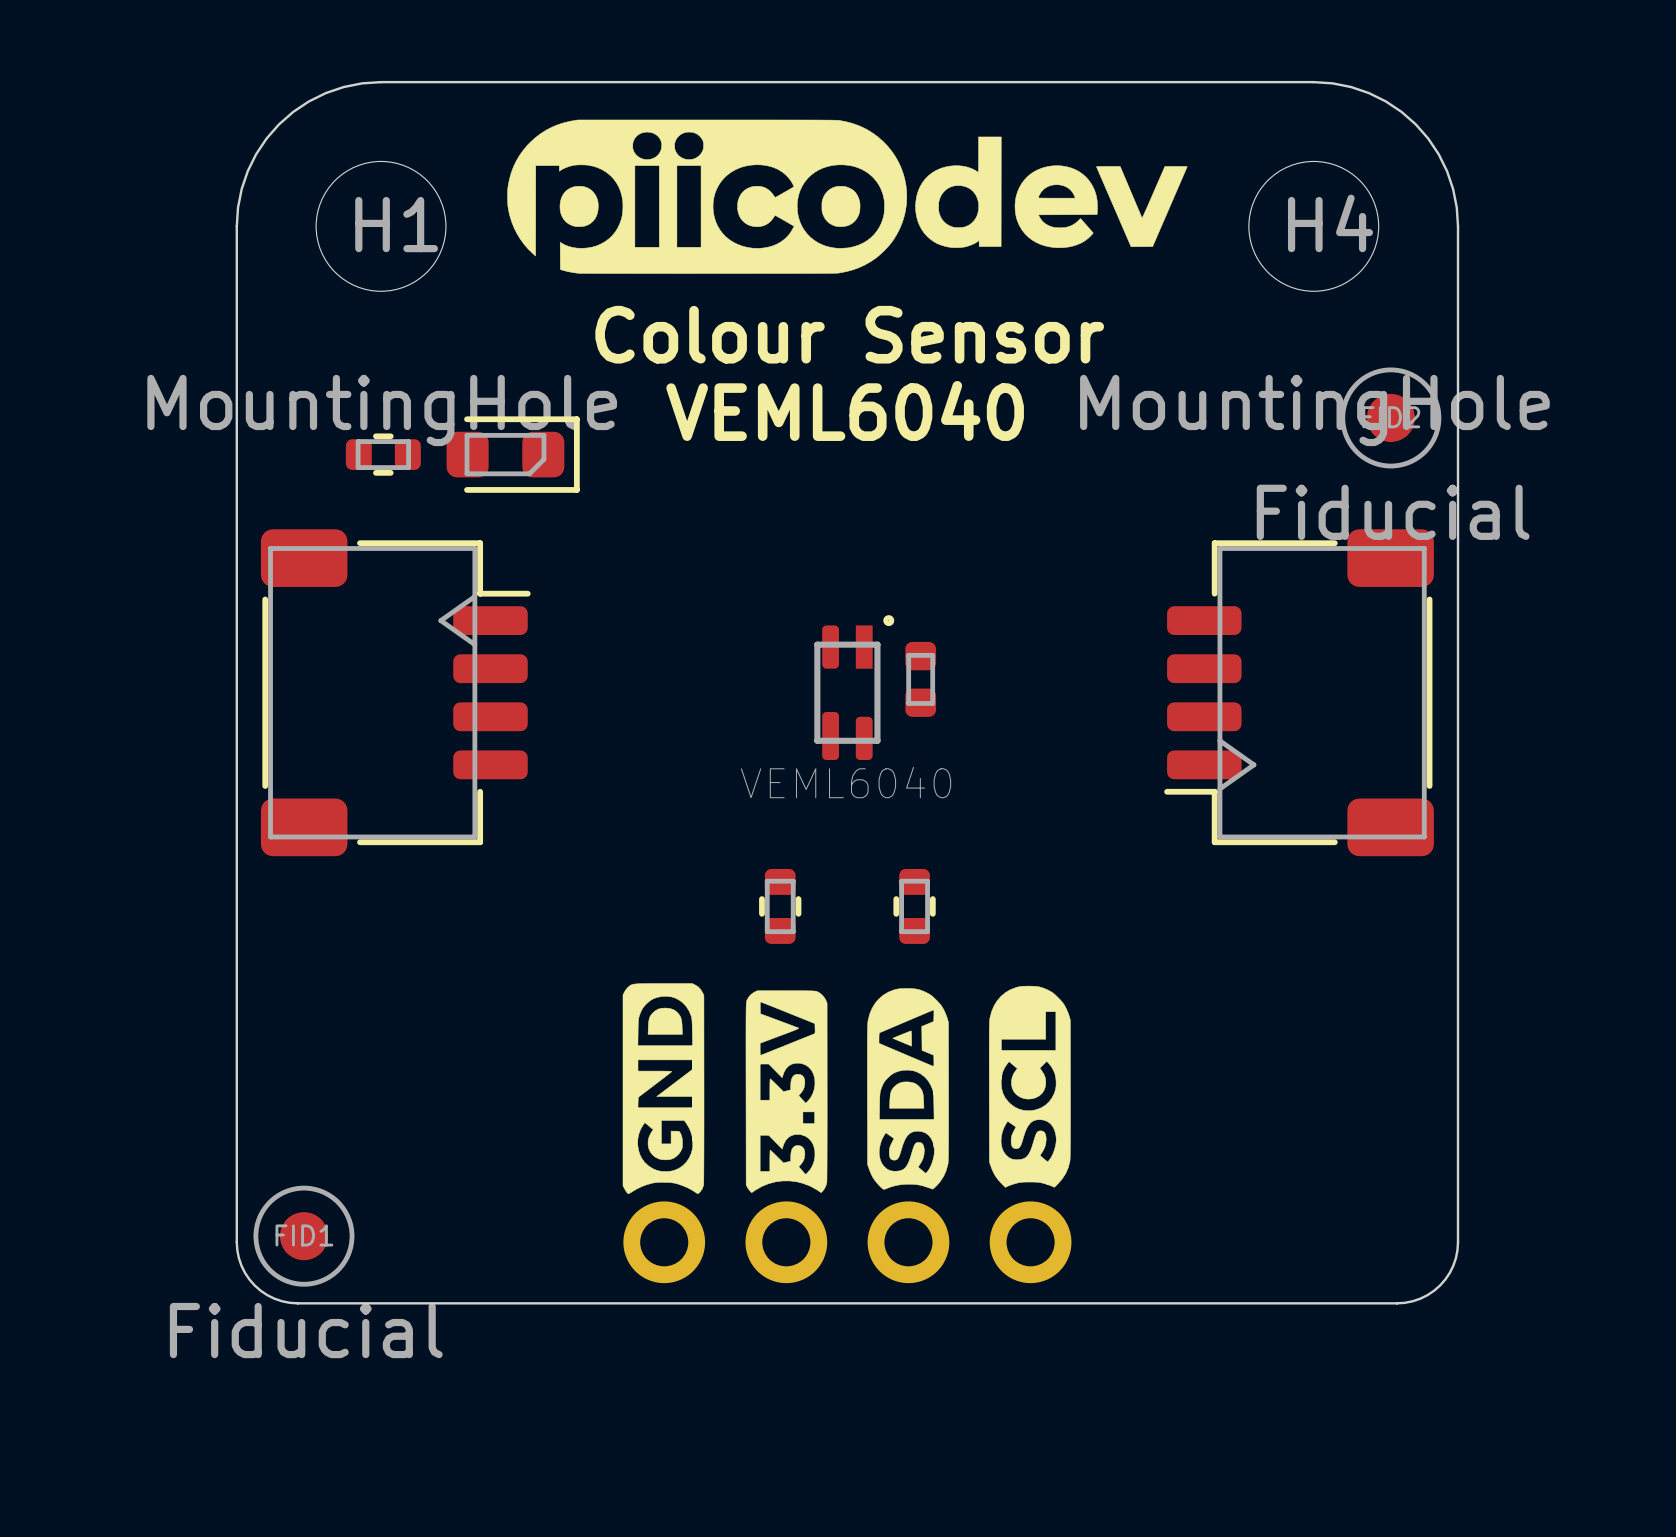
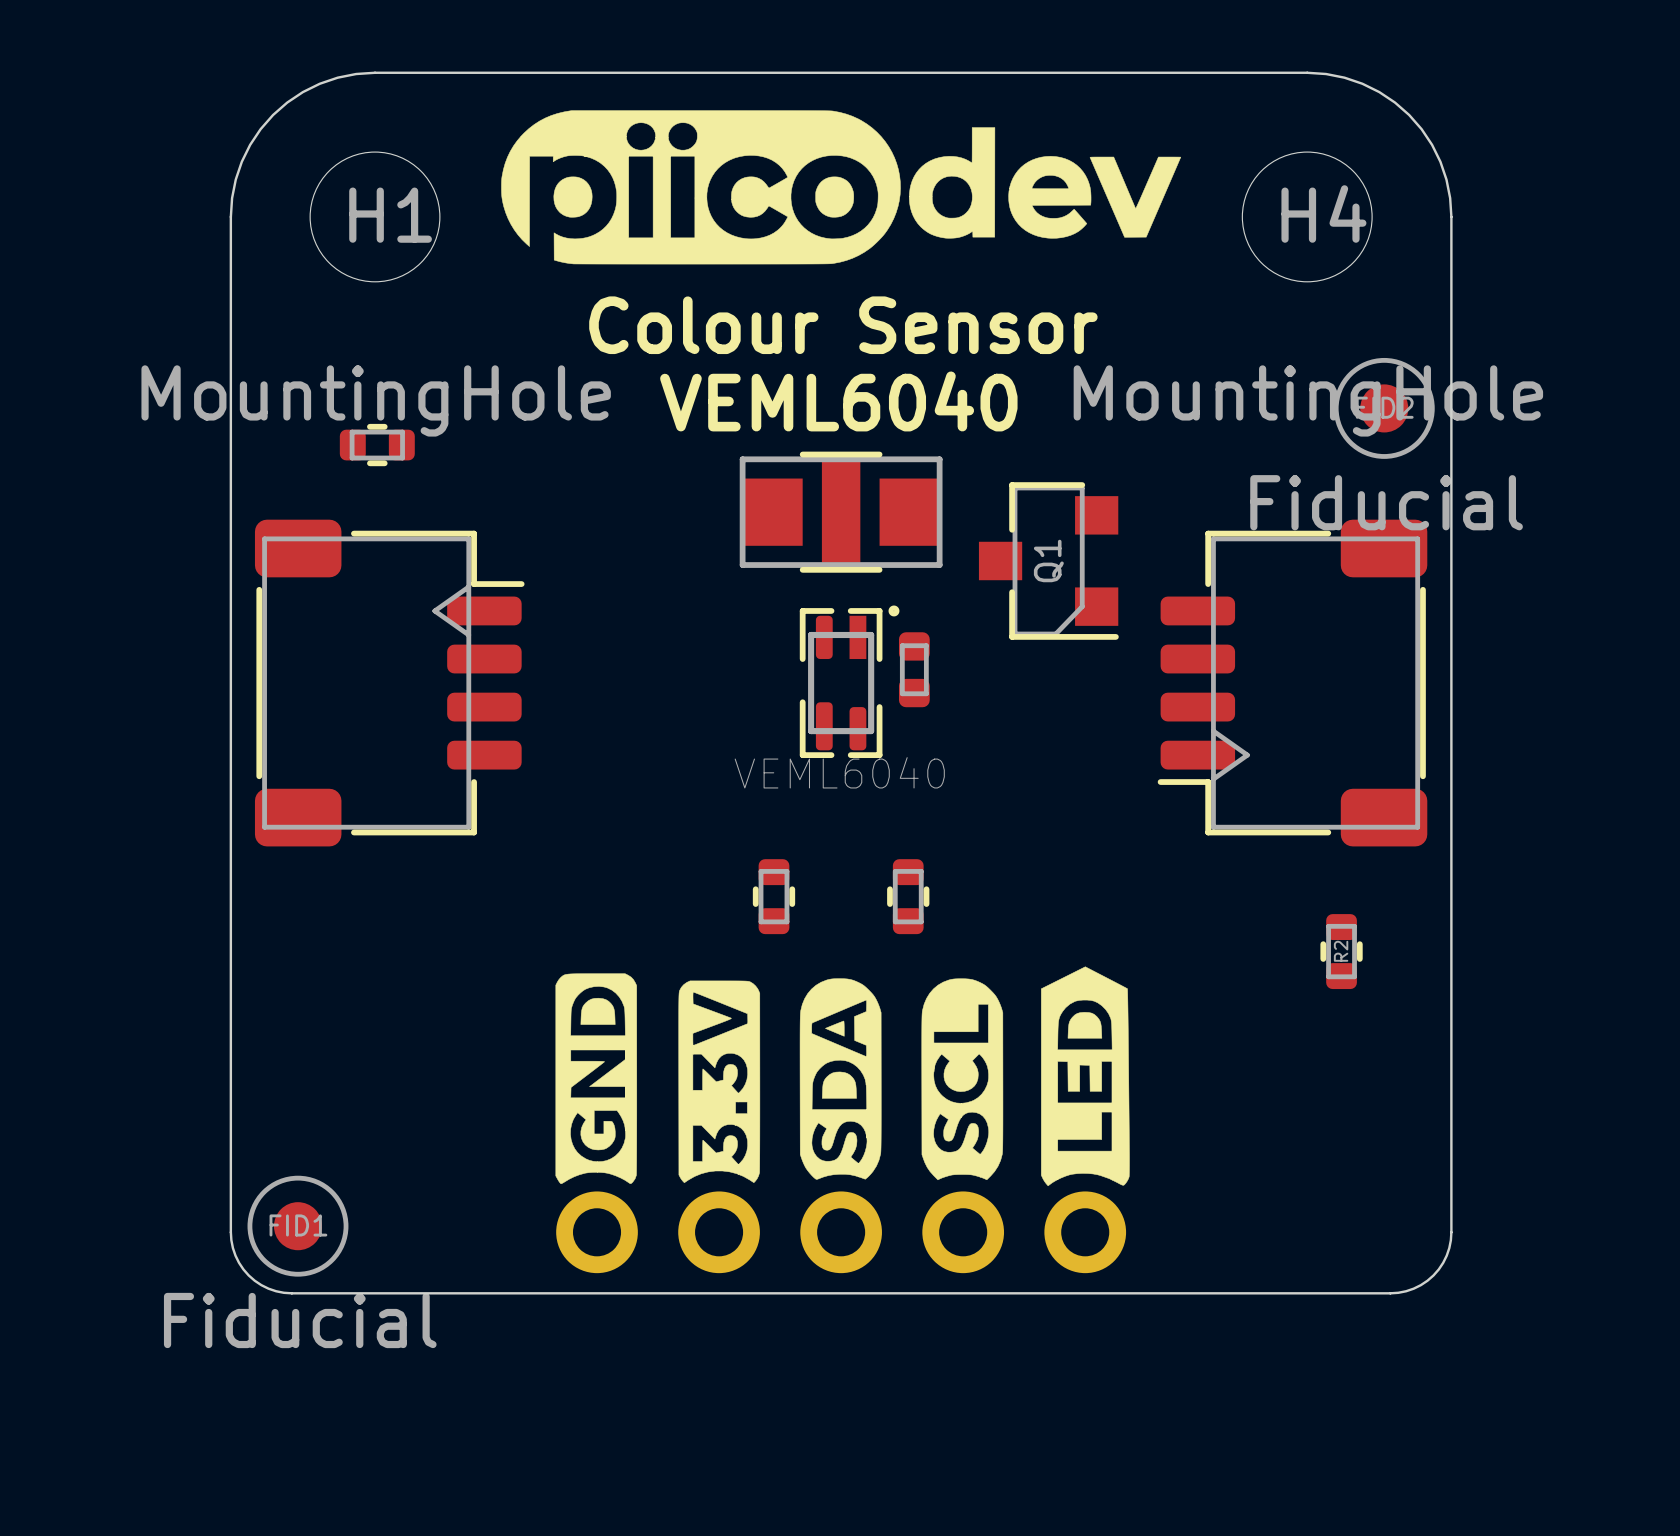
part: (513, 454) -> none
part: none -> (841, 512)
Q1: none -> (1048, 560)
part footprint: [814, 615, 895, 761] -> [799, 605, 900, 759]
R2: none -> (1341, 951)
part: none -> (1085, 1119)
part: none -> (779, 1123)
part: (847, 1133) -> none

